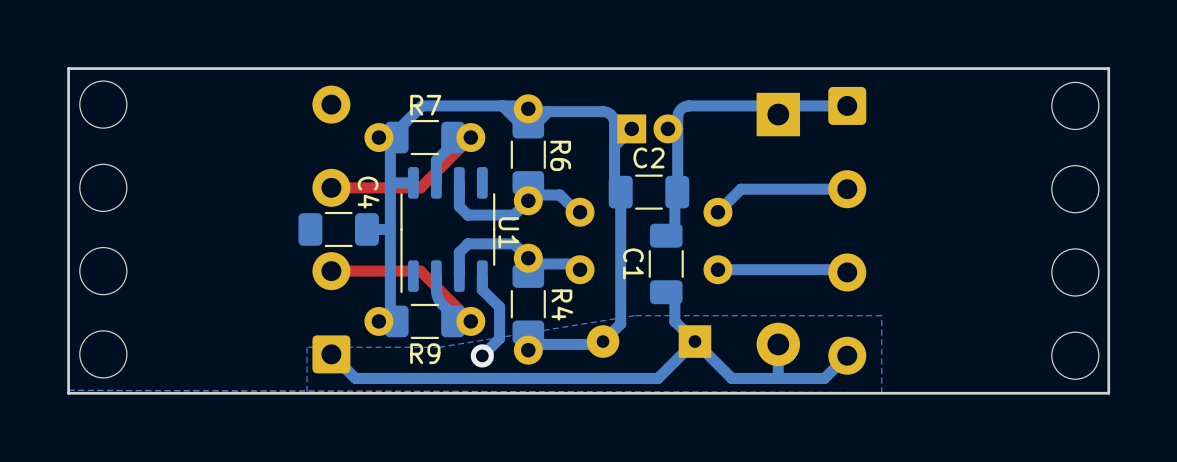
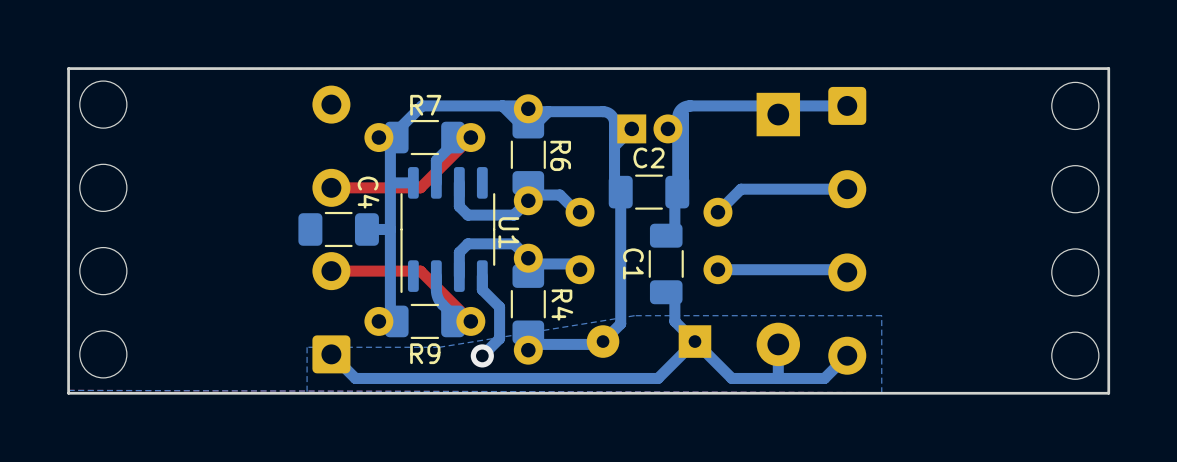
bottom track: none -> (683, 113) (683, 185)

